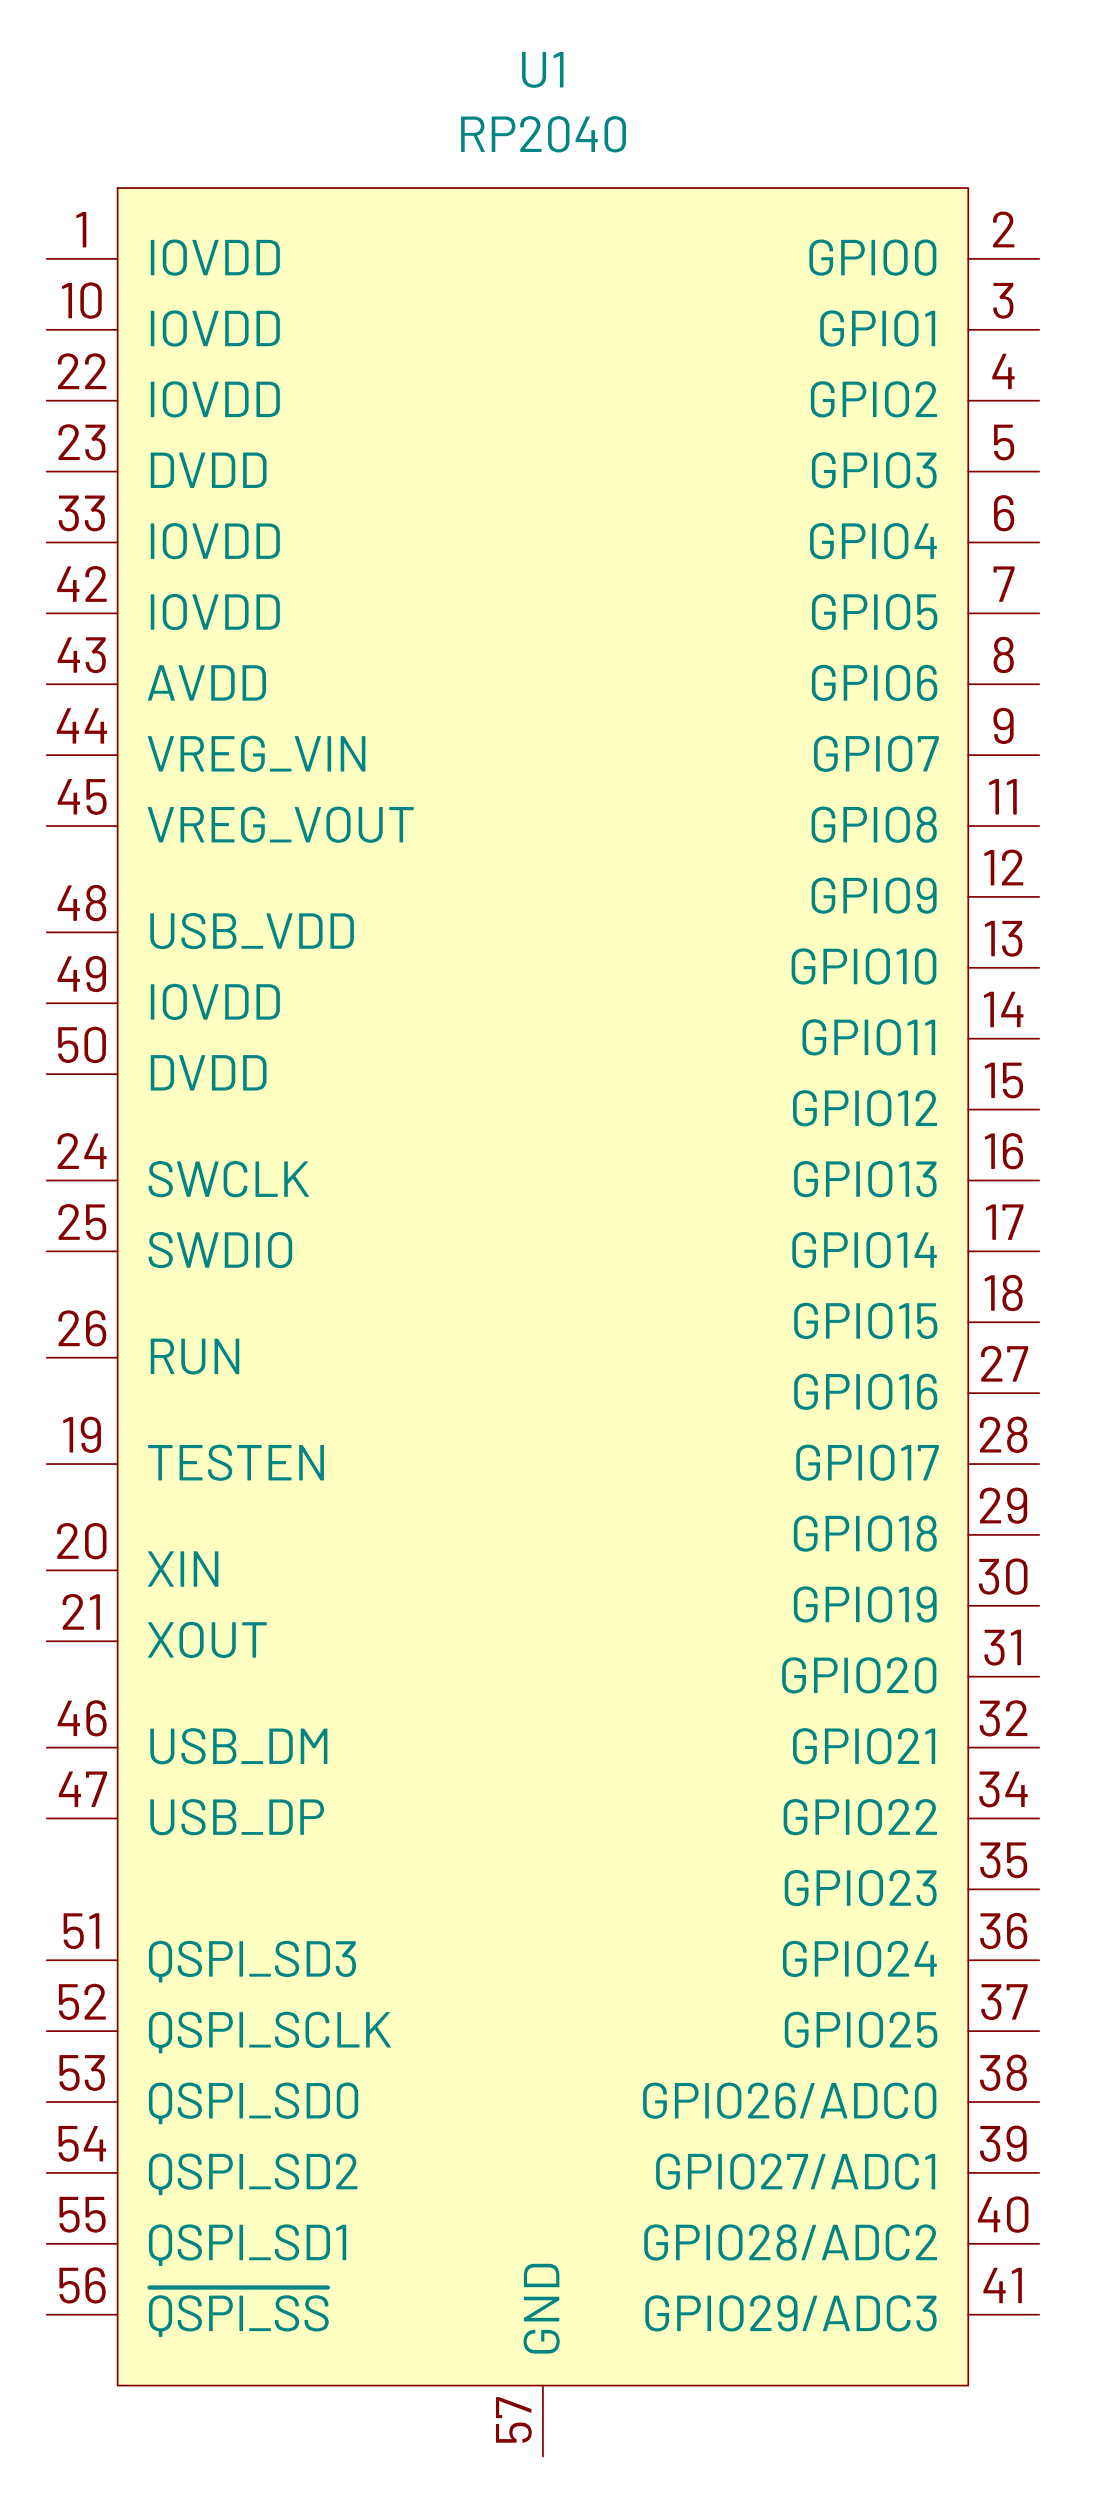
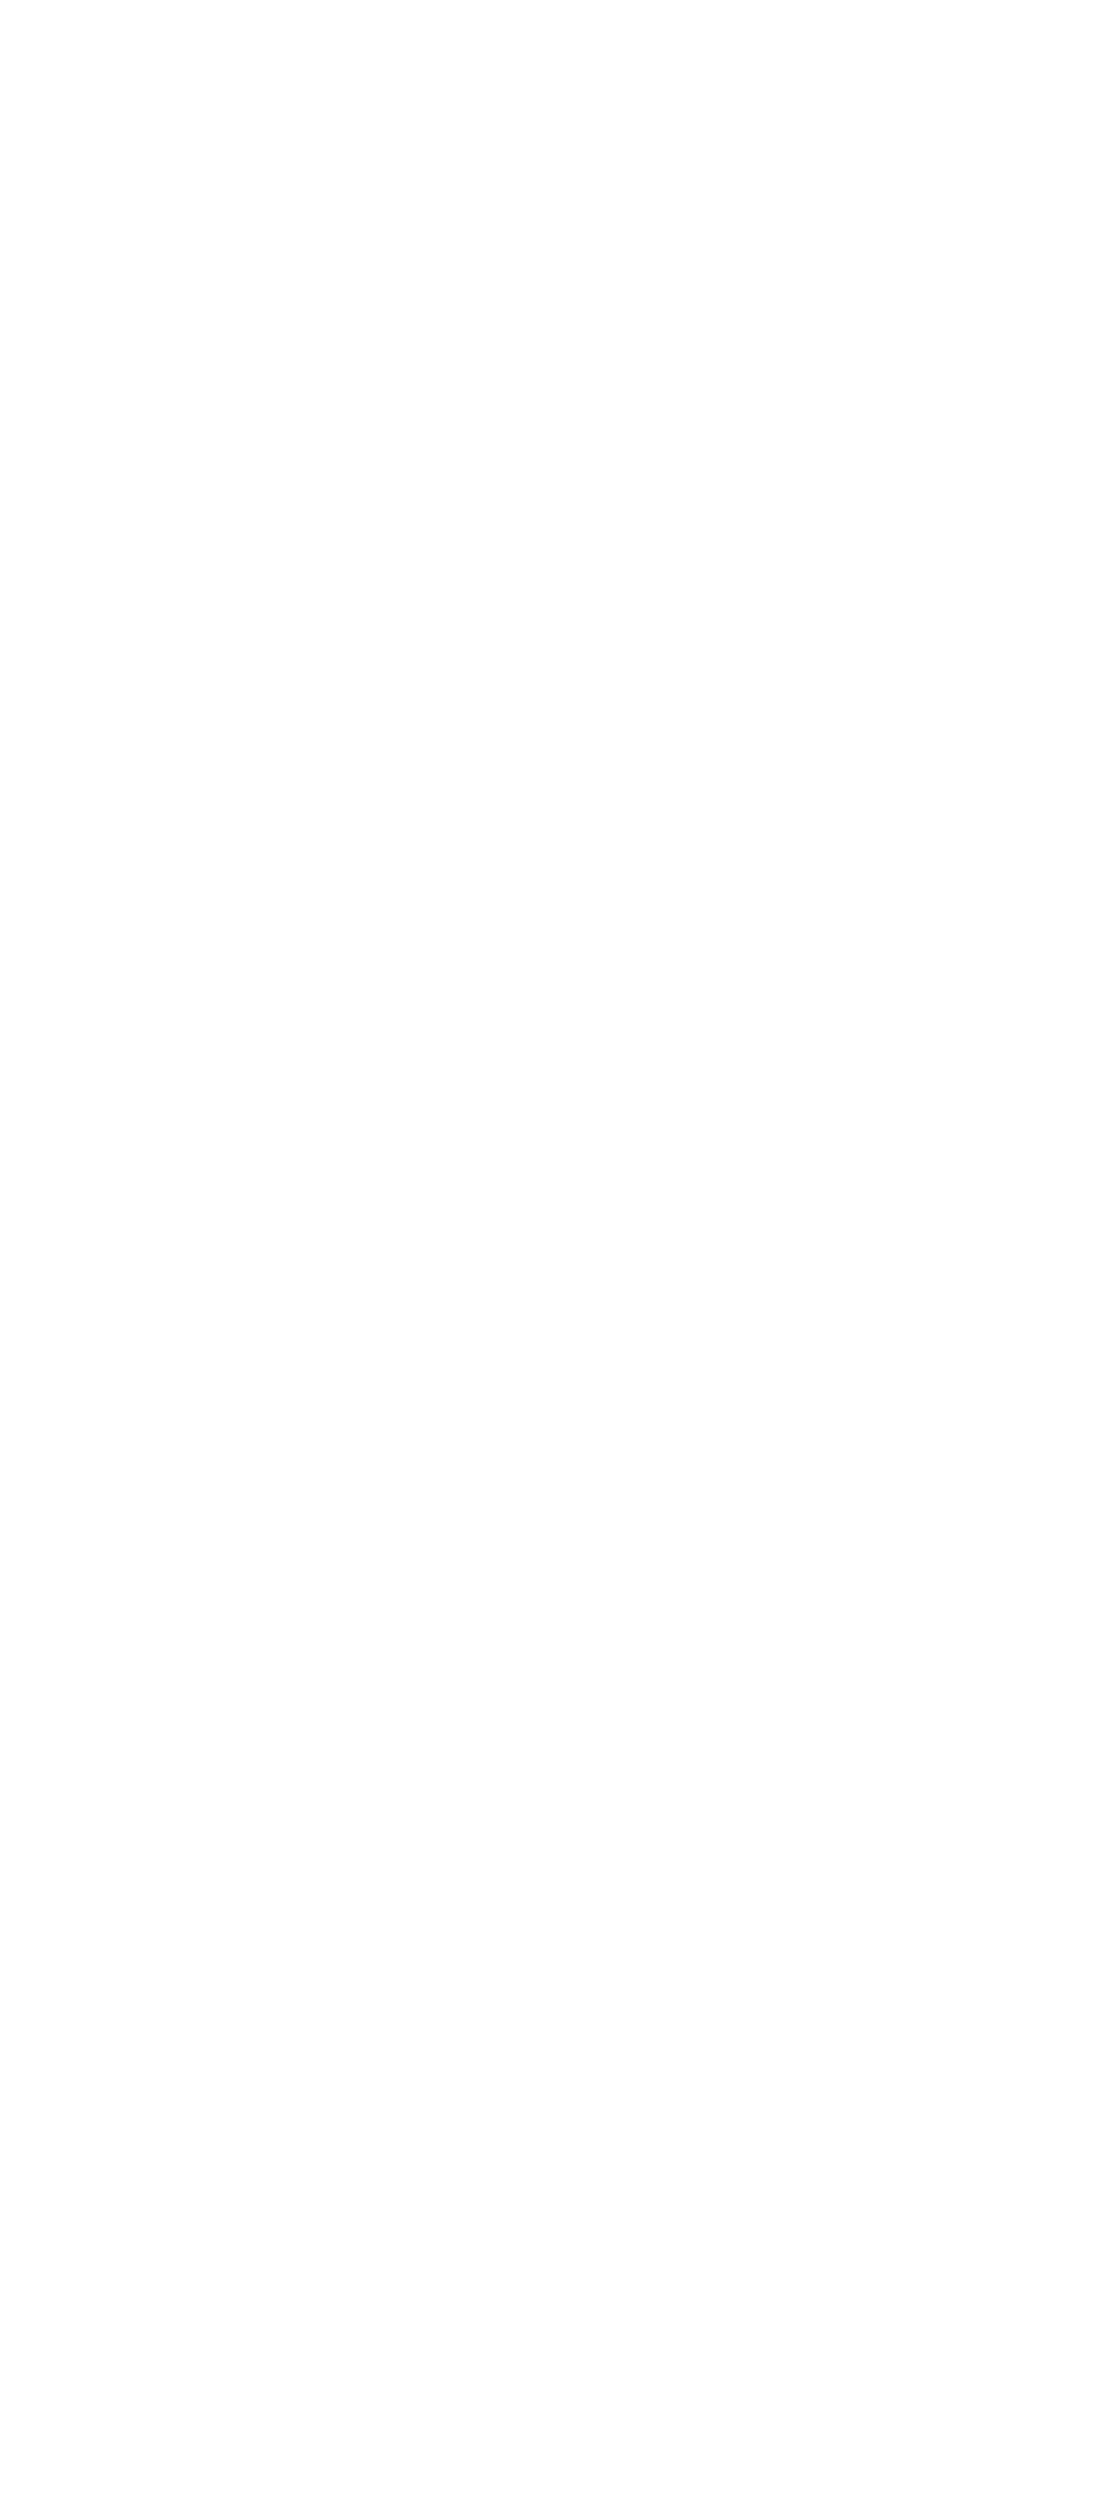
U1: RP2040 (542, 1322) -> none

